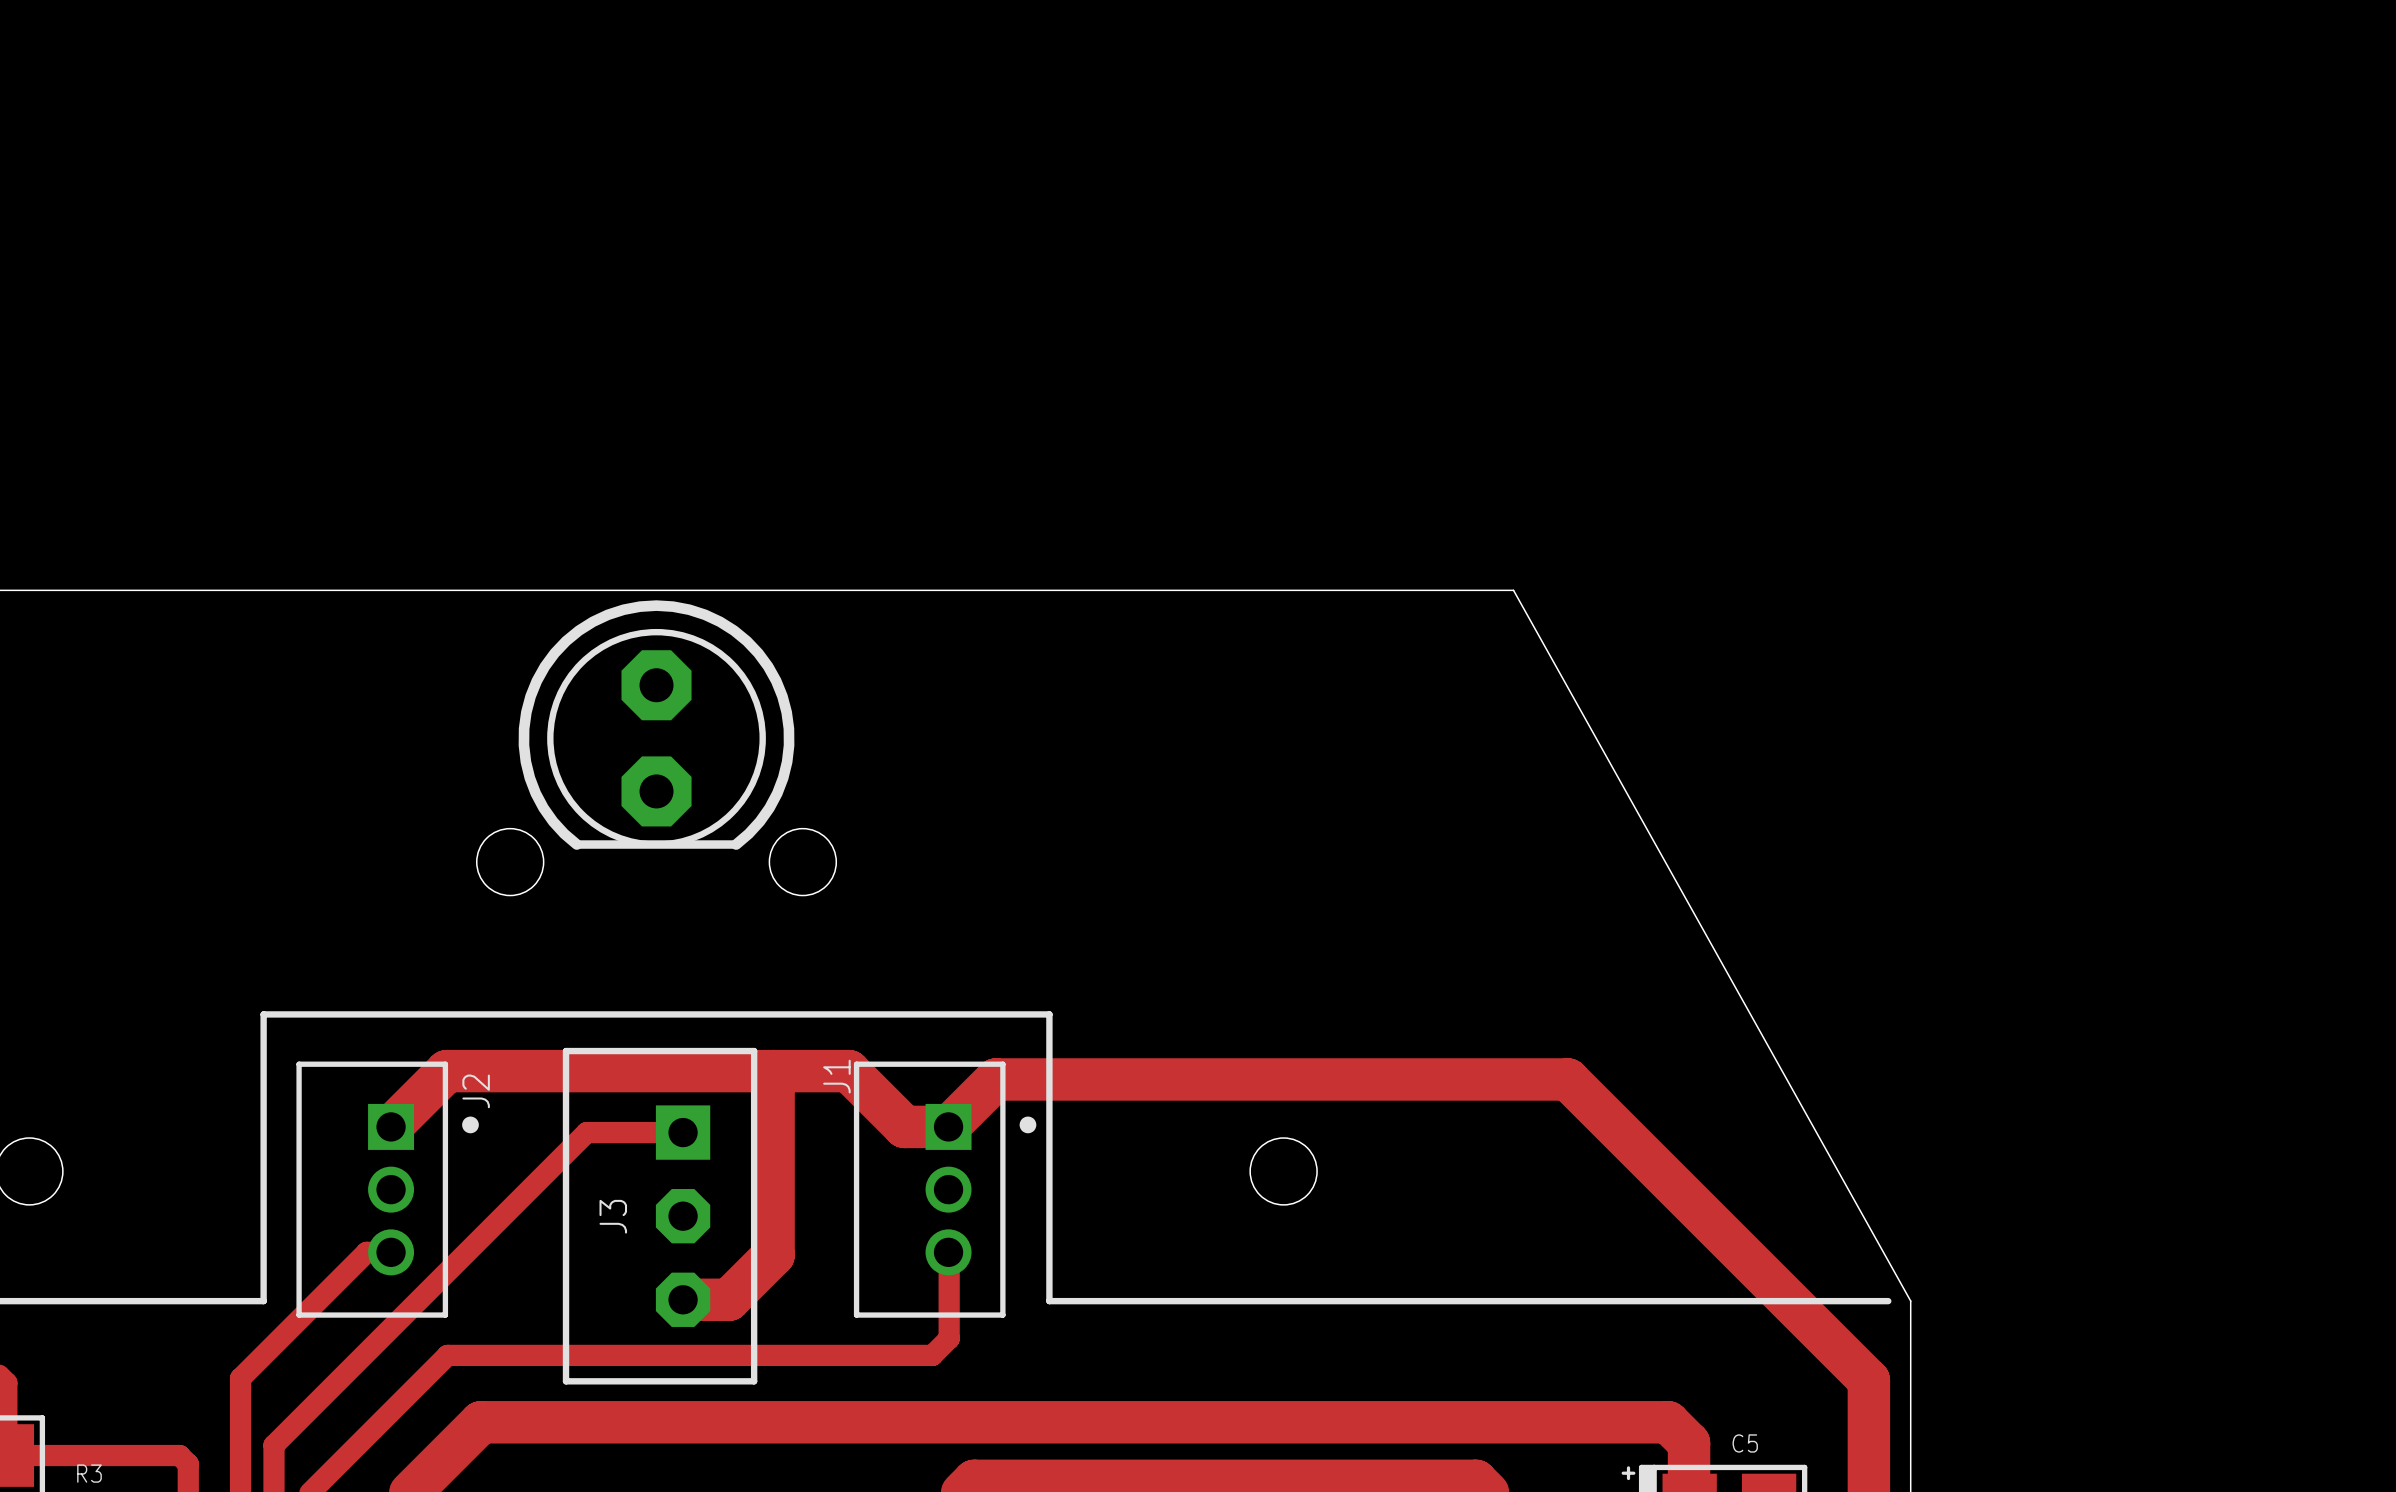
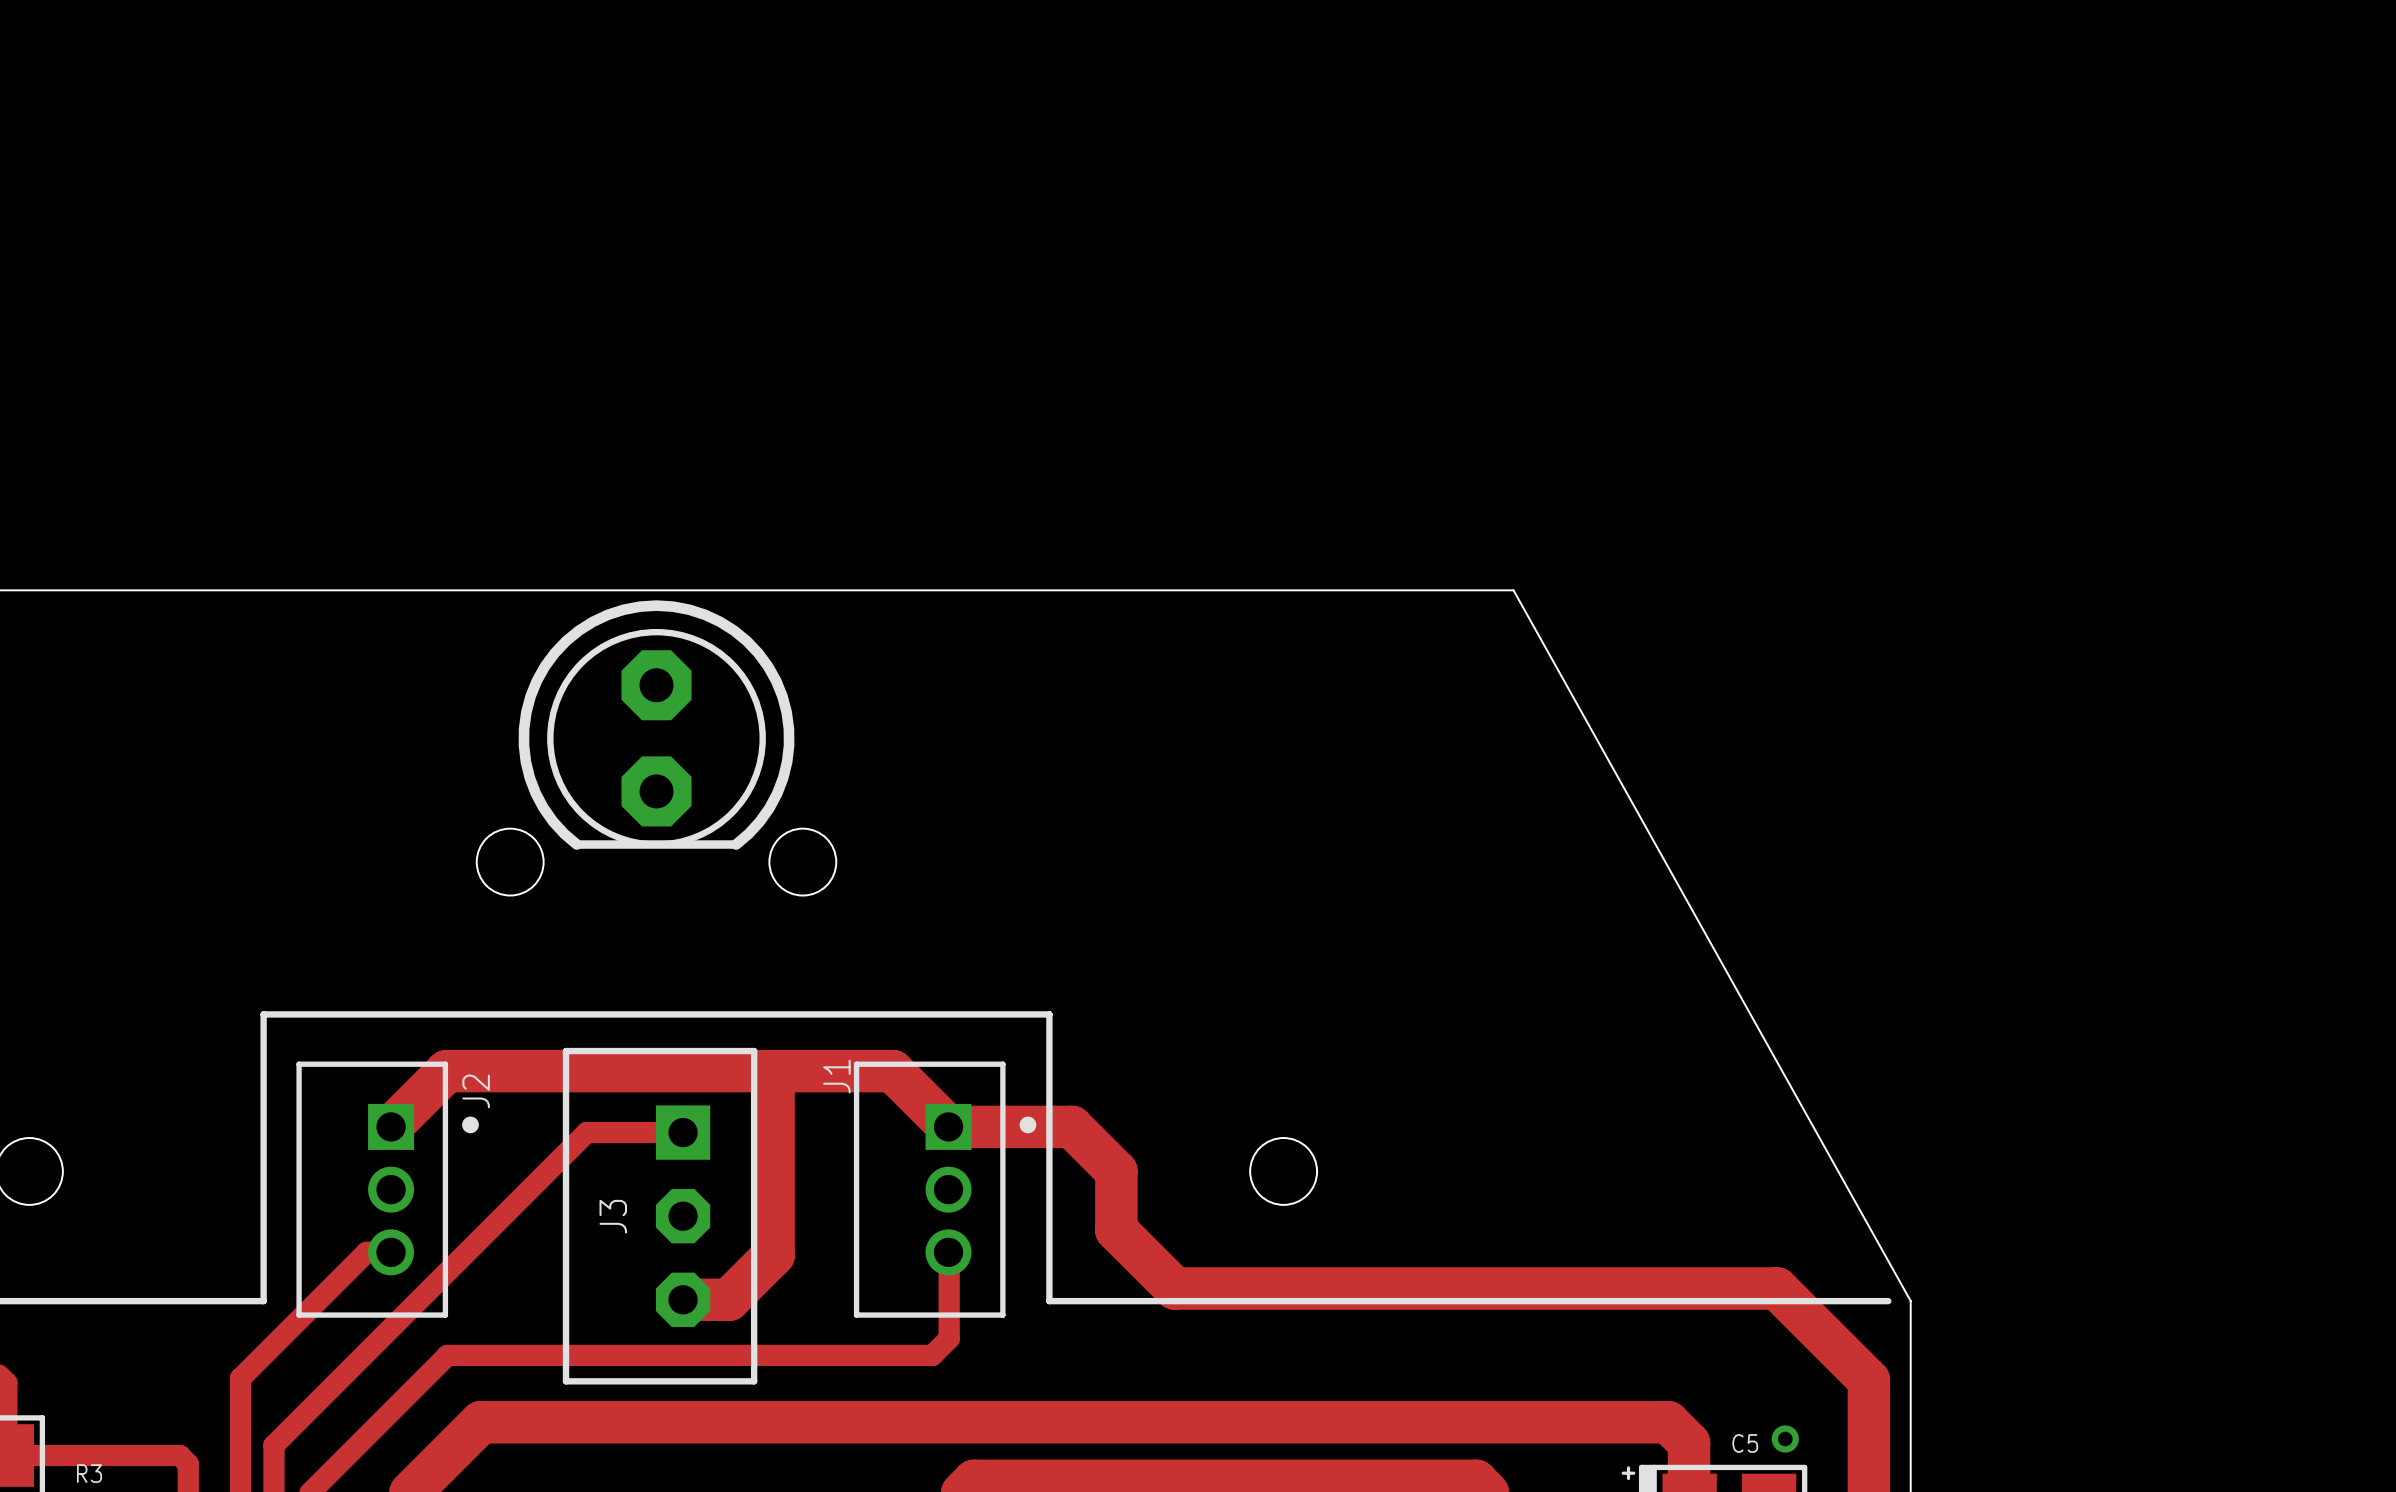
top track: (848, 1071) (904, 1126) (948, 1126) (995, 1079) (1567, 1079) (1776, 1288) -> (848, 1071) (892, 1071) (948, 1126) (1071, 1126) (1116, 1171) (1116, 1229) (1174, 1288) (1776, 1288)
via: none -> (1785, 1439)

